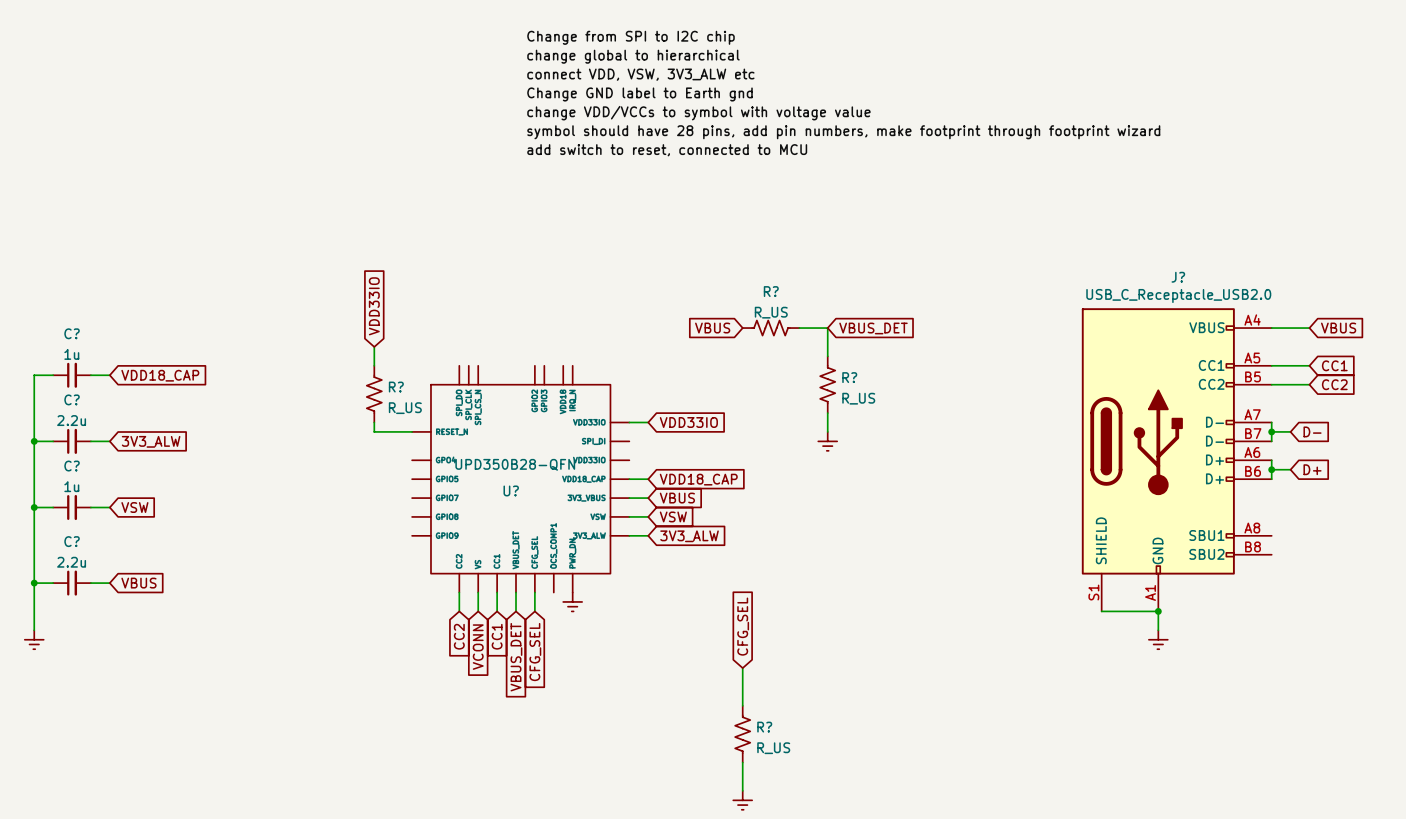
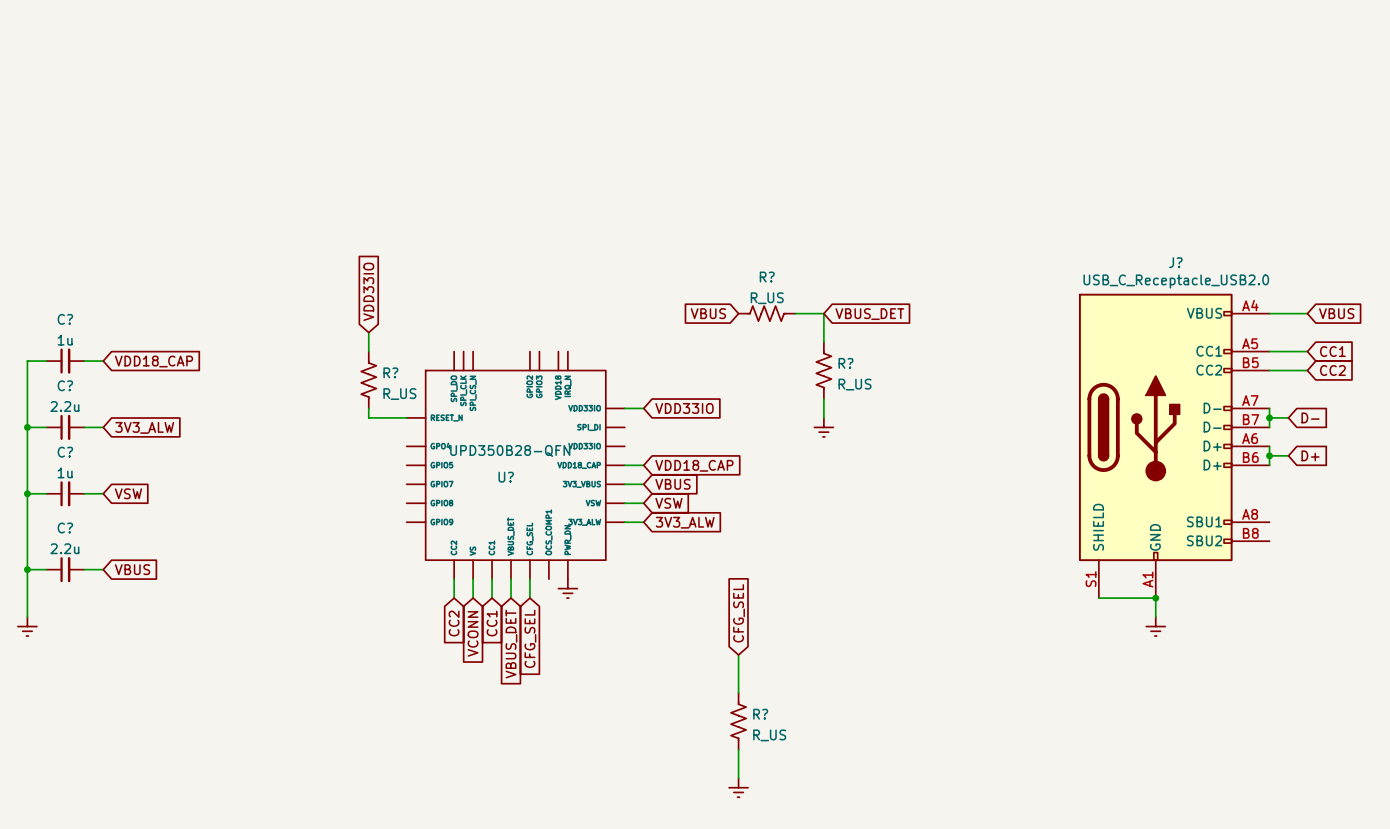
label: Change from SPI to I2C chip (631, 37) -> none
label: change global to hierarchical (633, 56) -> none
label: connect VDD, VSW, 3V3_ALW etc (640, 74) -> none
label: Change GND label to Earth gnd (640, 94) -> none
label: change VDD/VCCs to symbol with voltage value (698, 113) -> none
label: symbol should have 28 pins, add pin numbers, make footprint through footprint wizard (843, 132) -> none
label: add switch to reset, connected to MCU (667, 150) -> none

